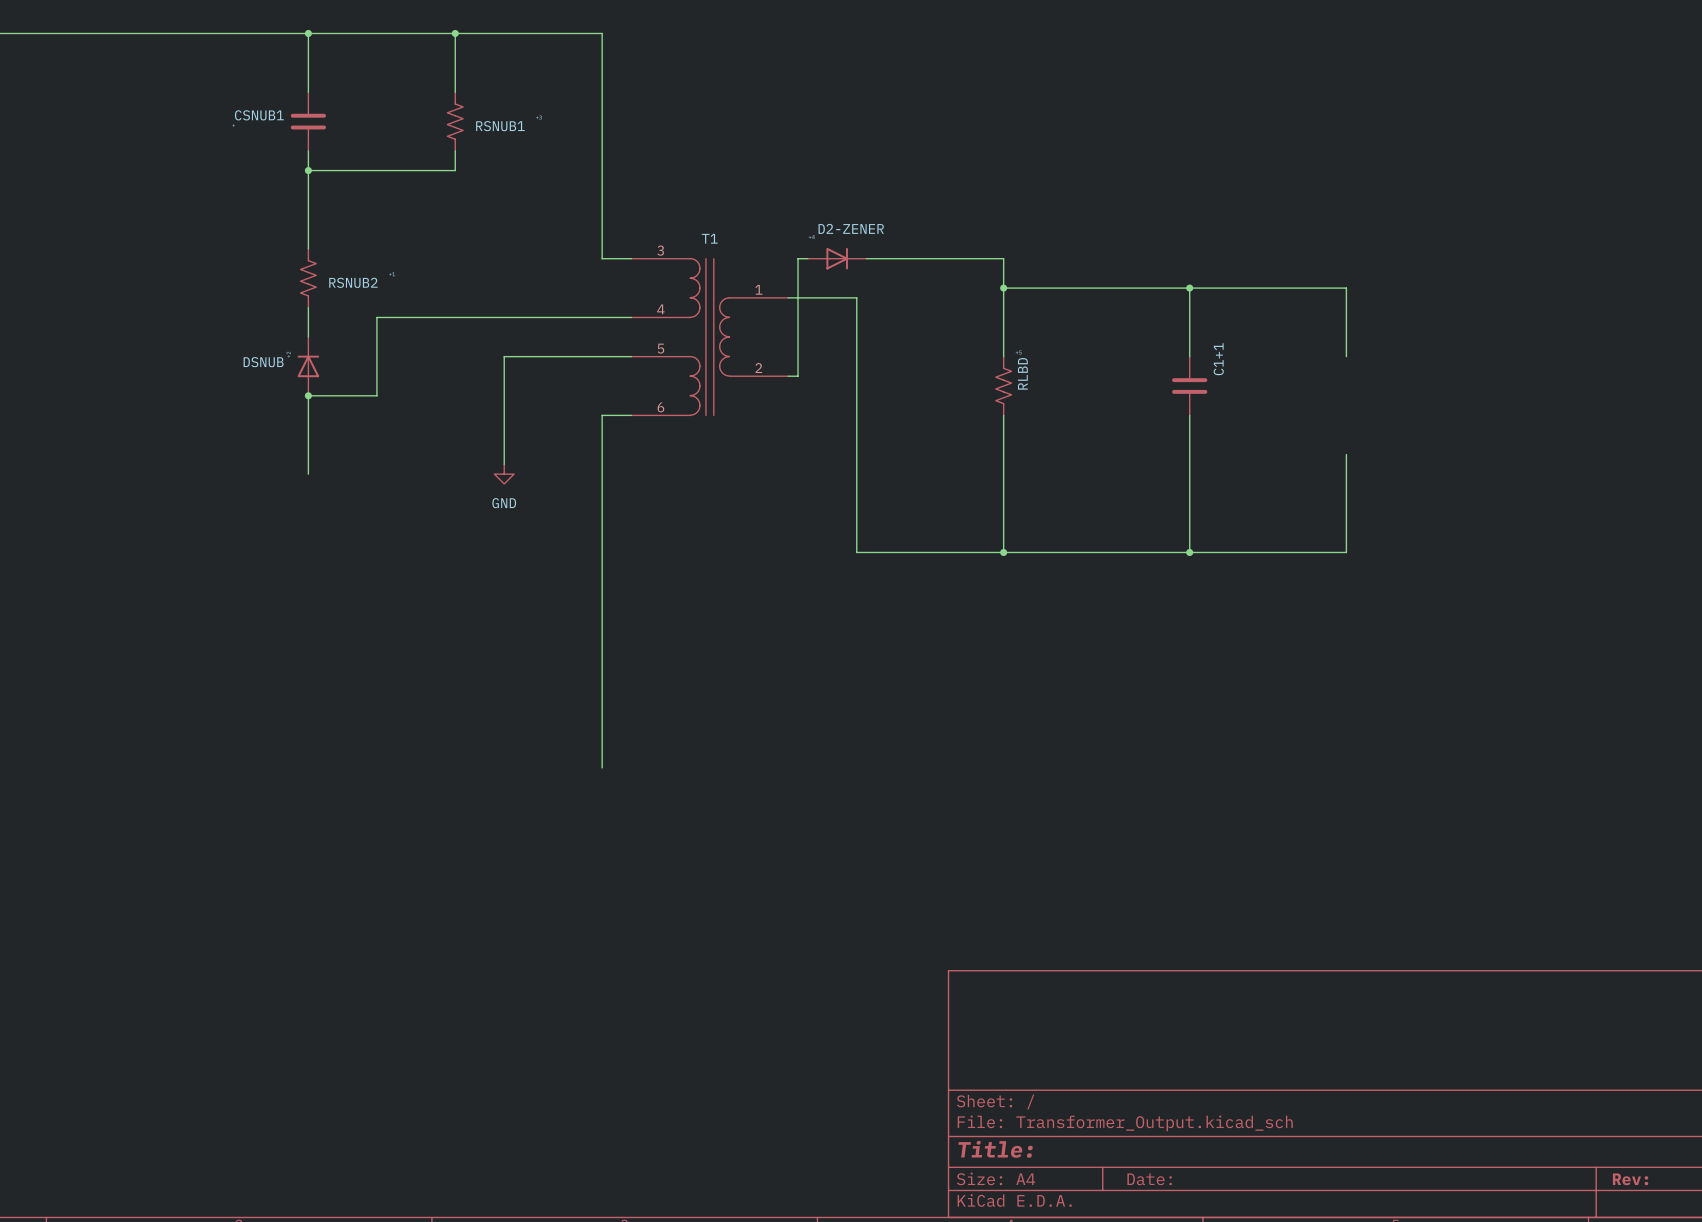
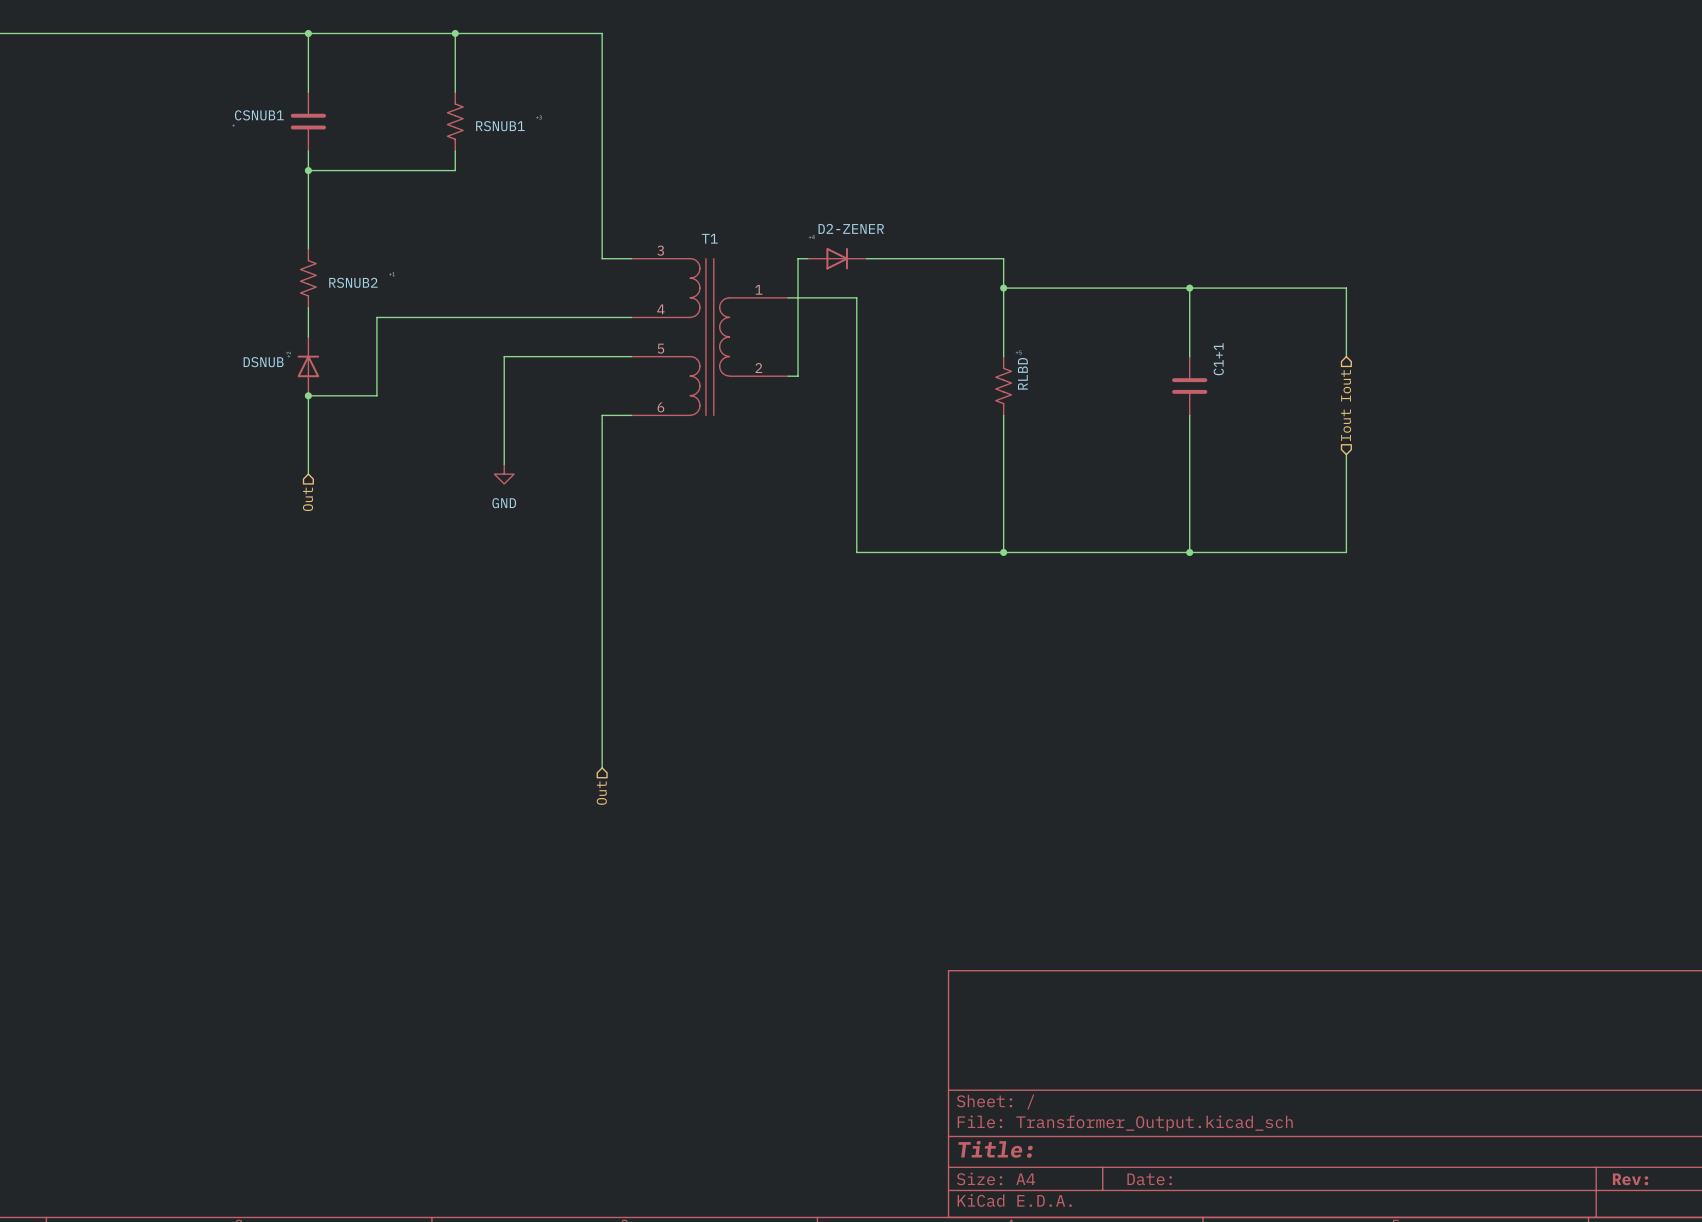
hierarchical label: none -> Iout (1346, 385)
hierarchical label: none -> Iout (1346, 425)
hierarchical label: none -> Out (308, 499)
hierarchical label: none -> Out (601, 793)

